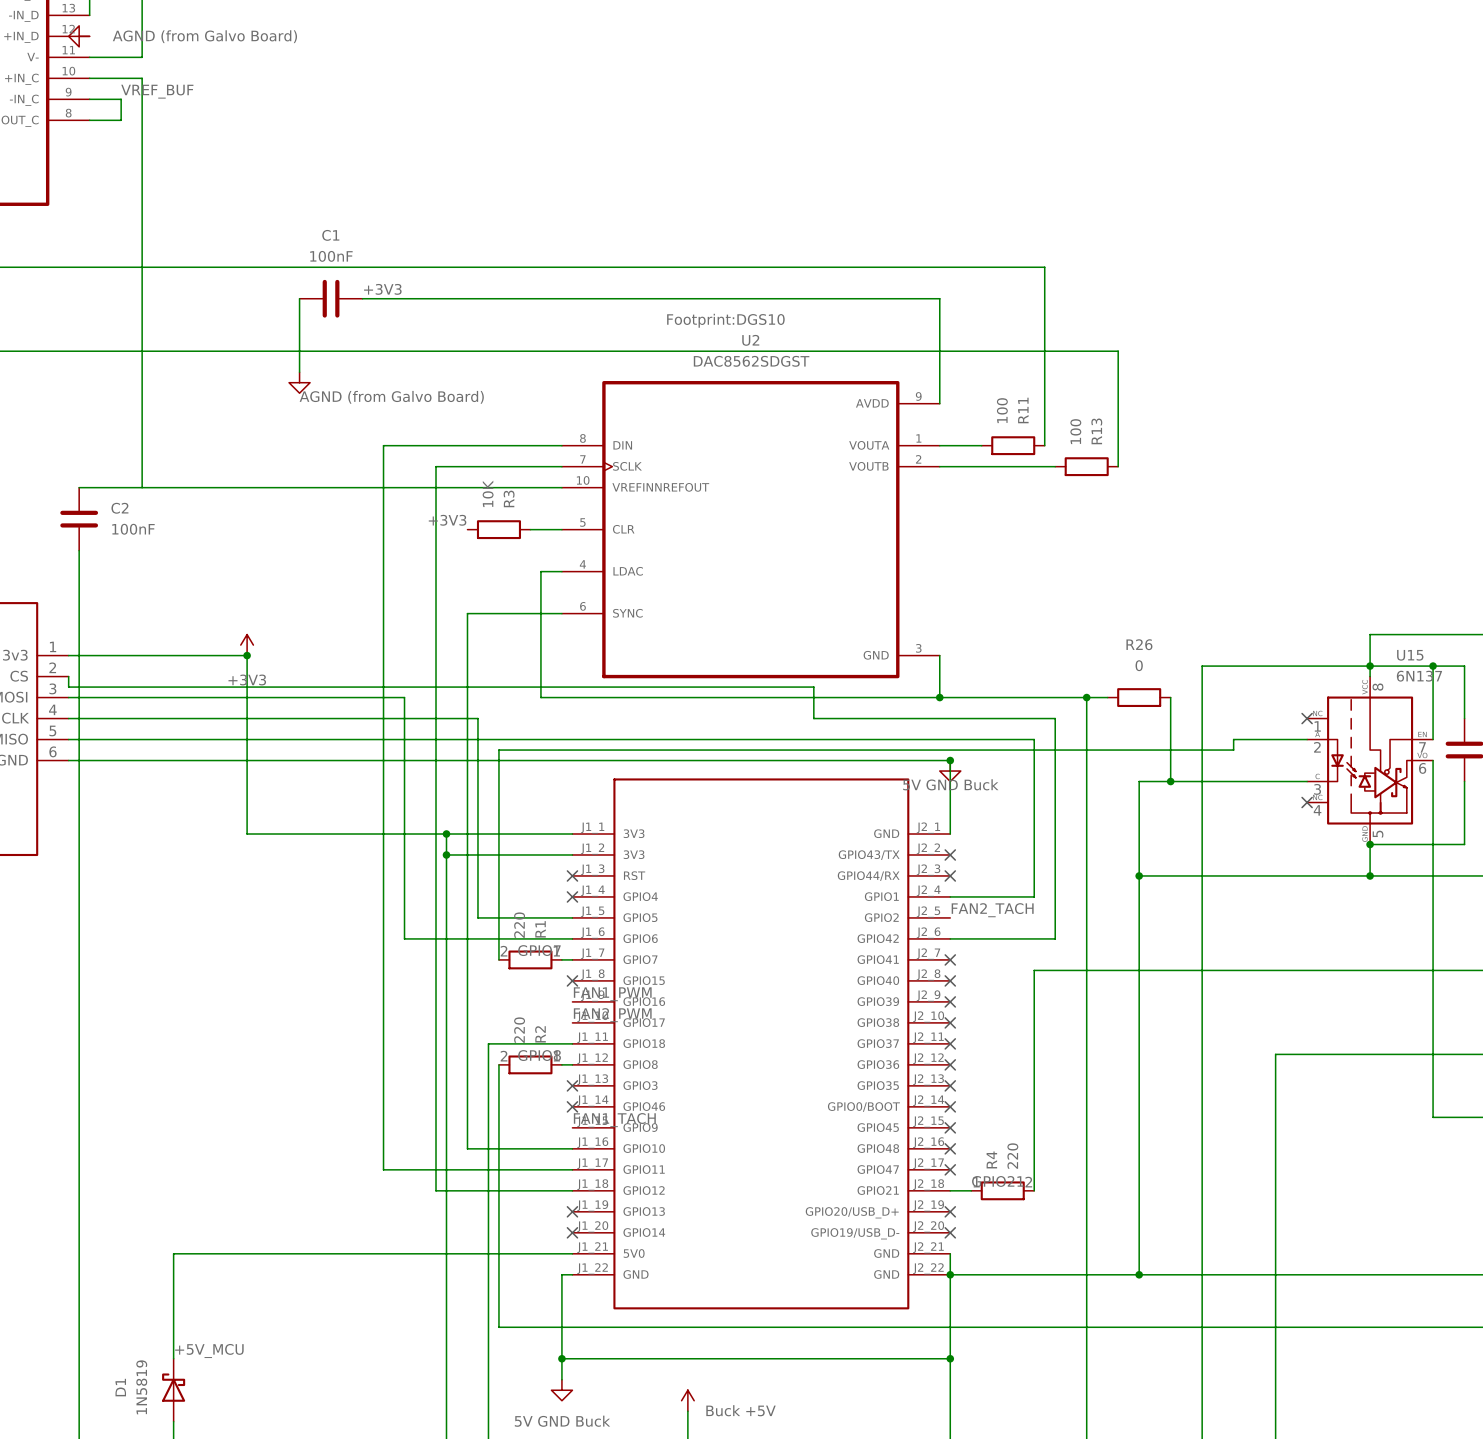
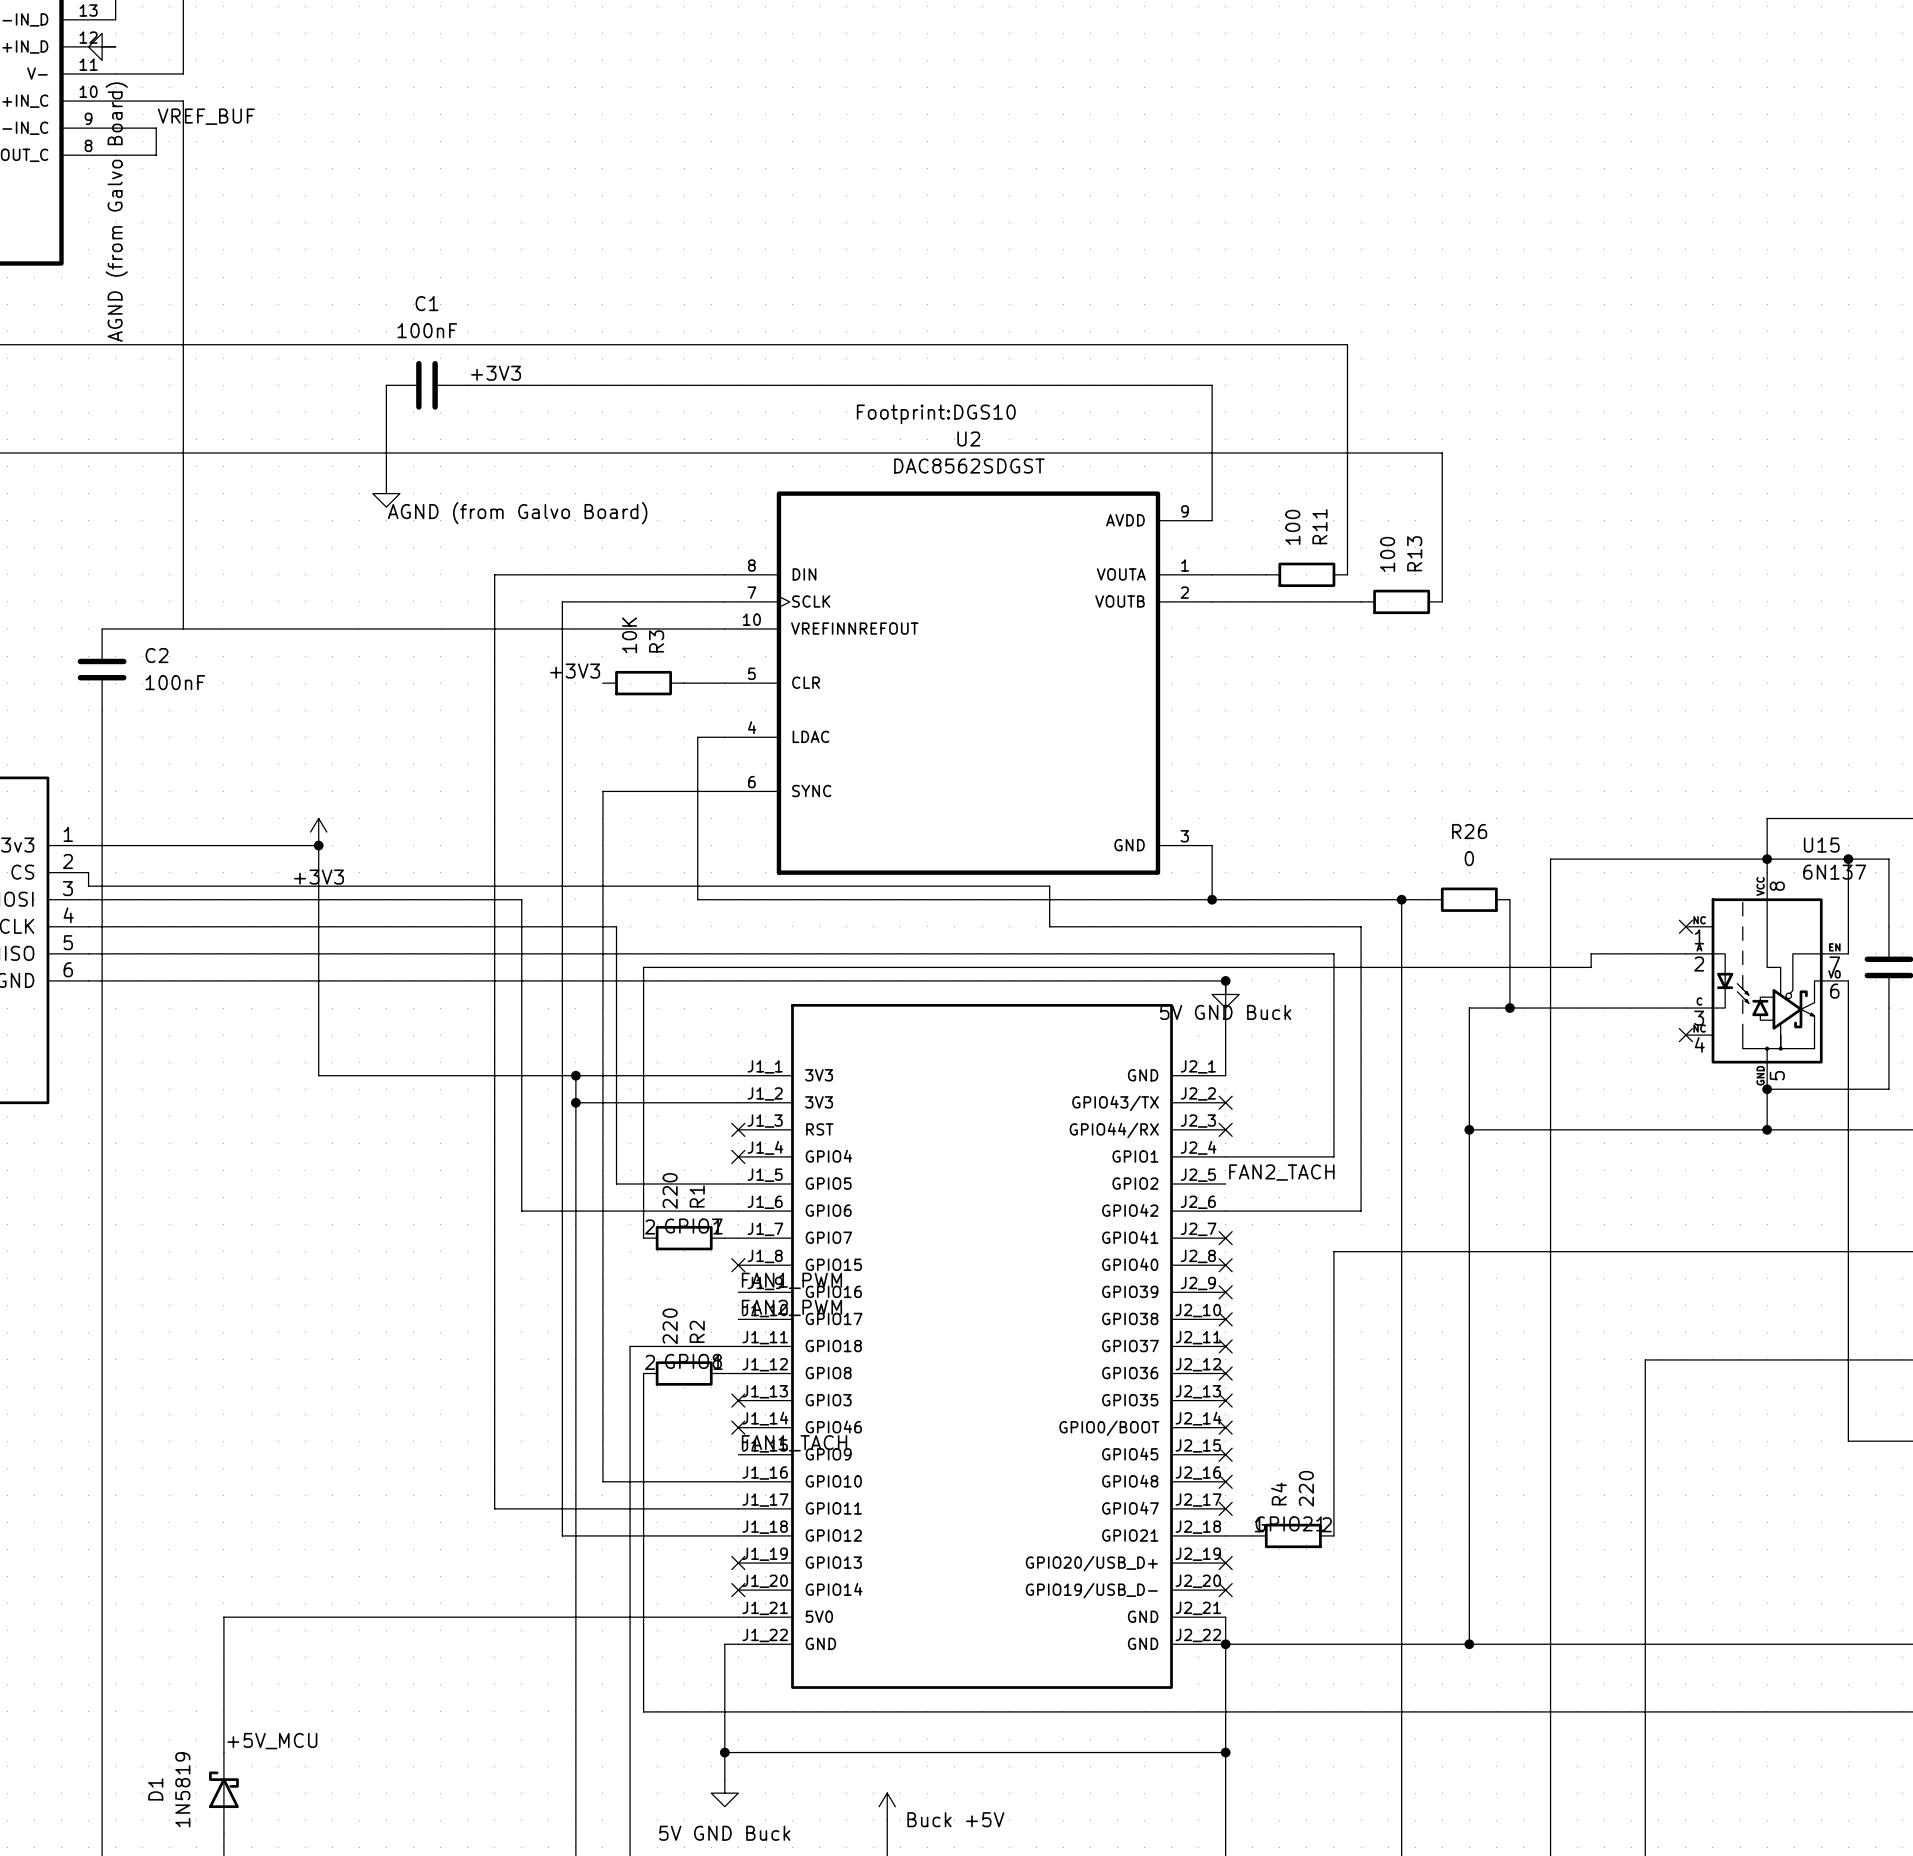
power symbol text rotation: 0° (204, 36) -> 90° counterclockwise (116, 212)

